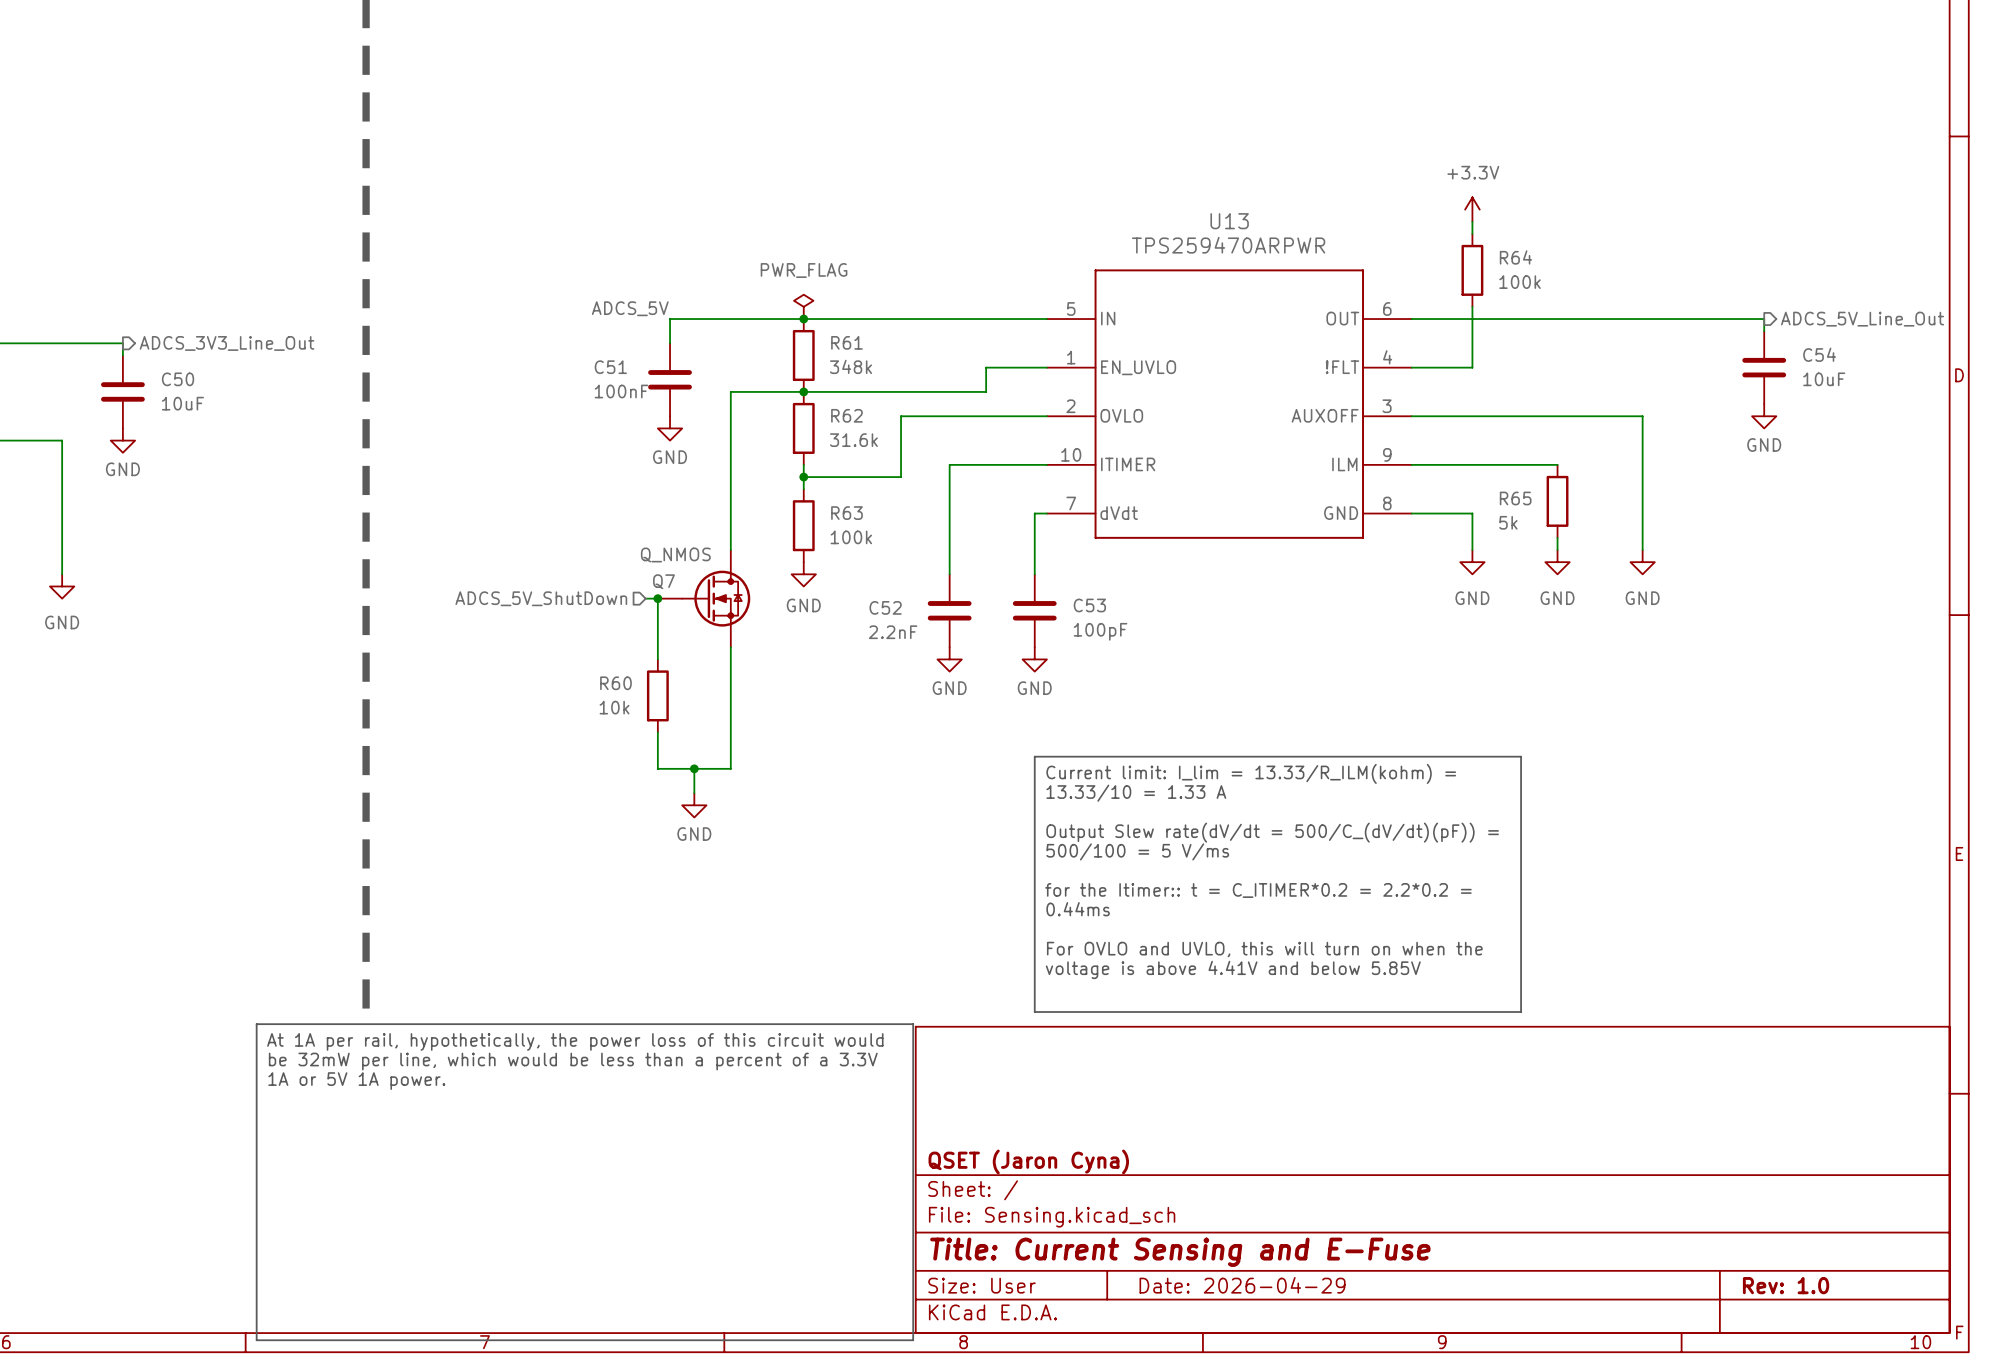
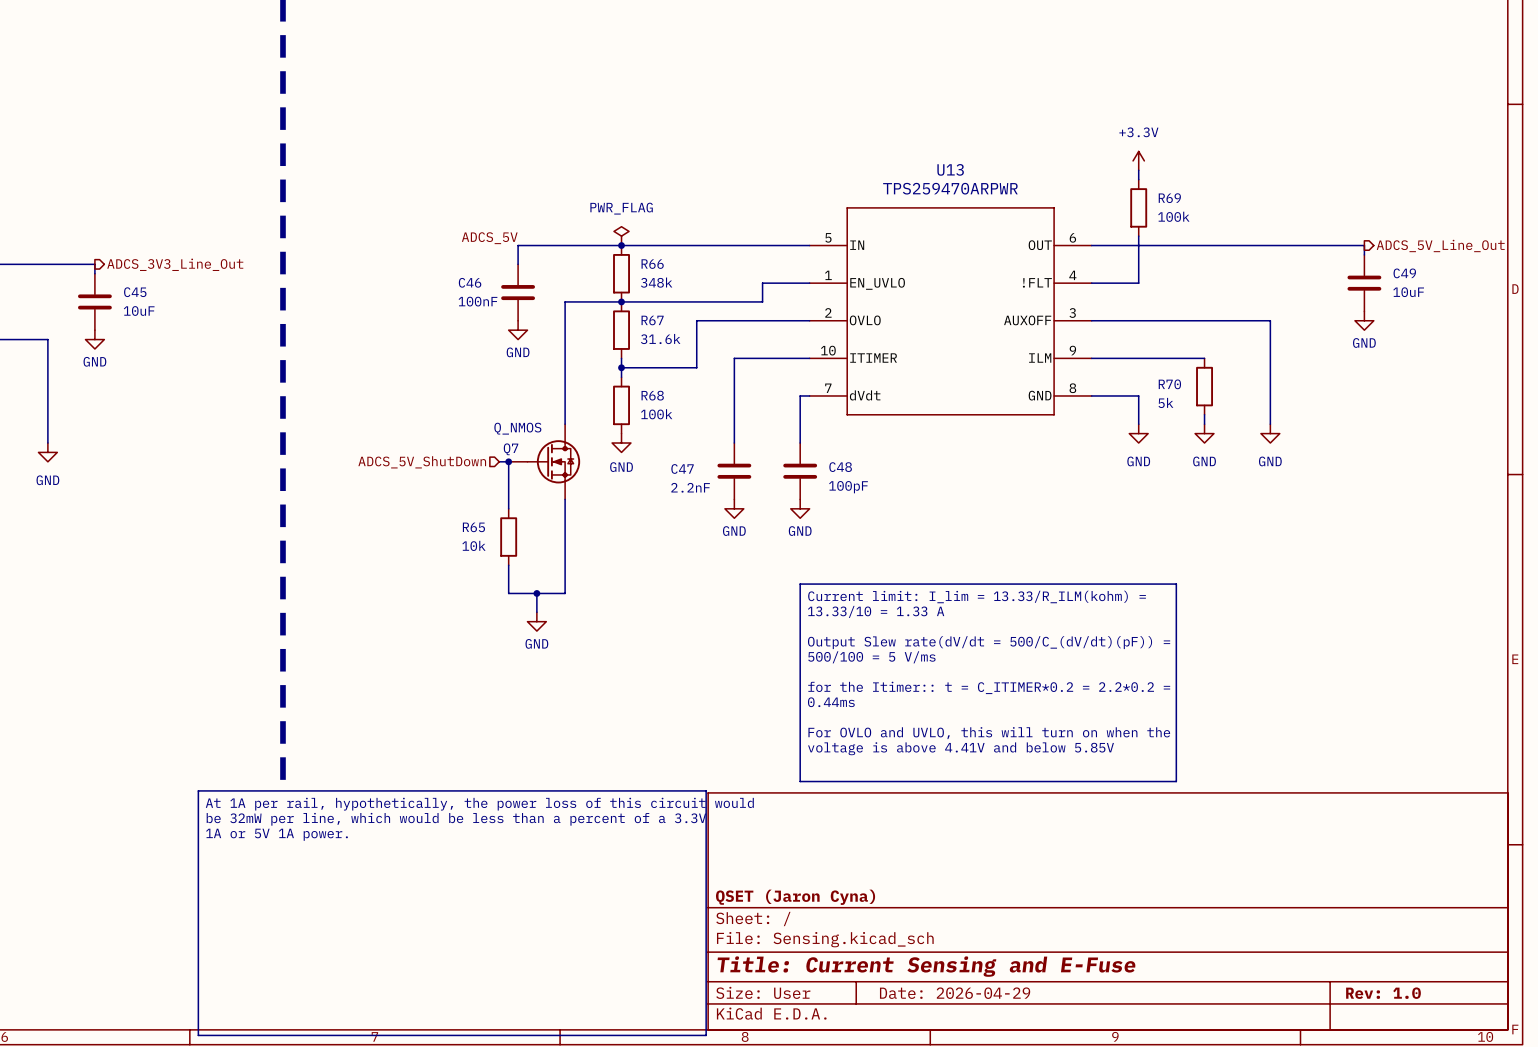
R64 name: R64 (1515, 257) -> R69 (1169, 198)
R61 name: R61 (846, 342) -> R66 (652, 264)
C54 name: C54 (1819, 354) -> C49 (1404, 273)
C51 name: C51 (610, 367) -> C46 (470, 282)
C50 name: C50 (178, 379) -> C45 (135, 292)
R62 name: R62 (846, 415) -> R67 (652, 320)
R65 name: R65 (1515, 498) -> R70 (1169, 384)
R63 name: R63 (846, 513) -> R68 (652, 395)
C53 name: C53 (1089, 605) -> C48 (840, 467)
C52 name: C52 (885, 607) -> C47 (682, 468)
R60 name: R60 (615, 683) -> R65 (473, 527)

